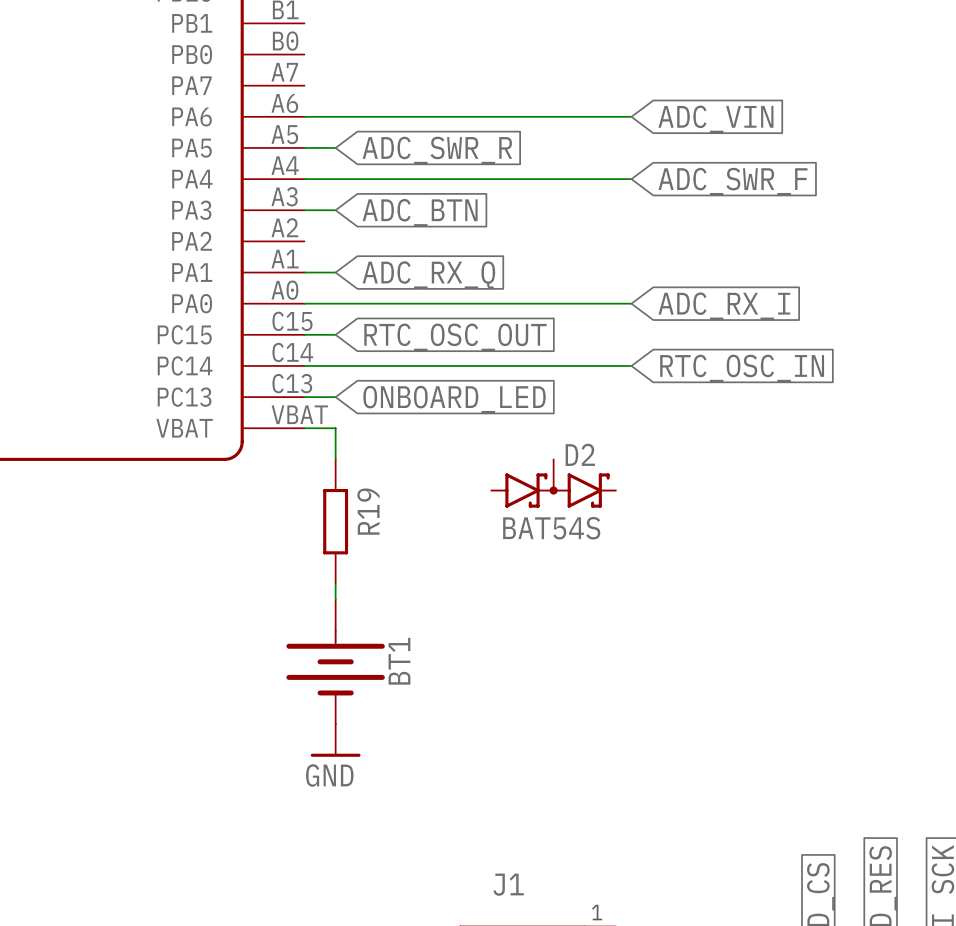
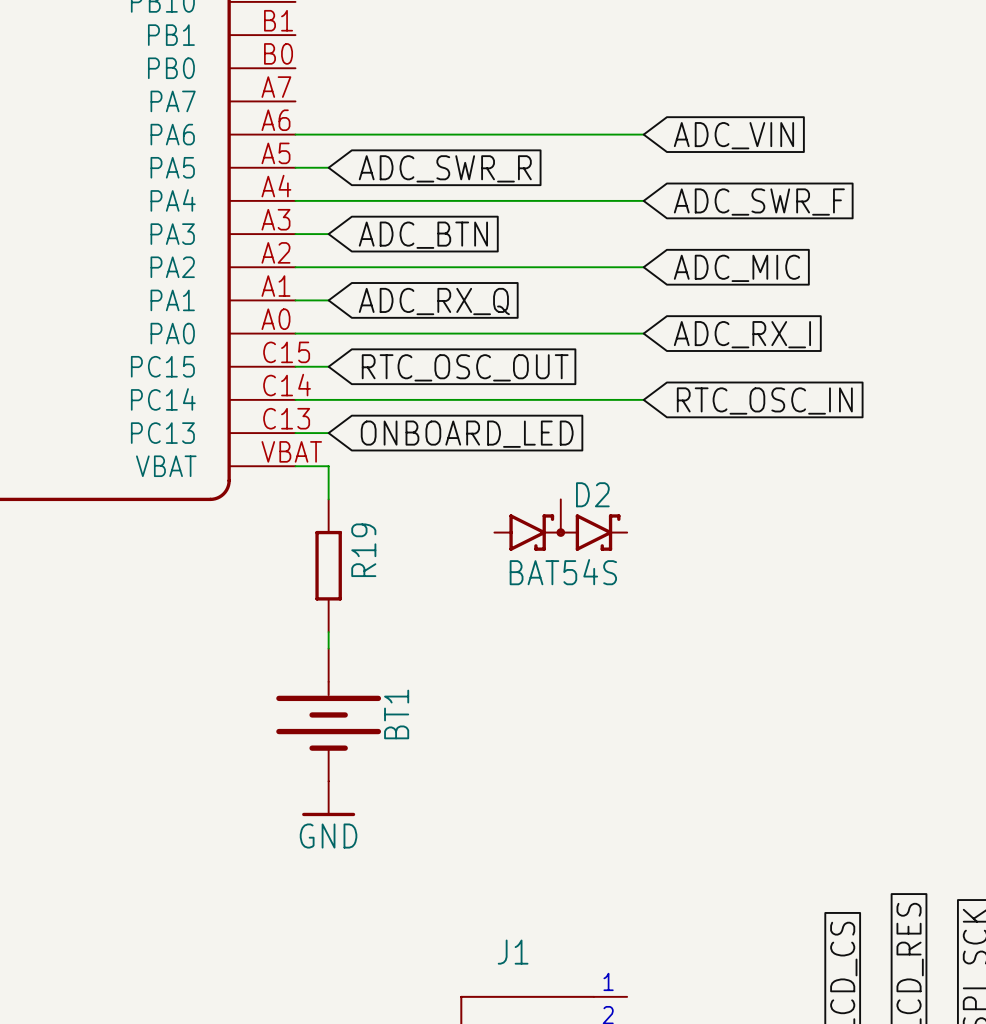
wire: none -> (295, 267) (643, 267)
global label: none -> ADC_MIC (736, 268)

